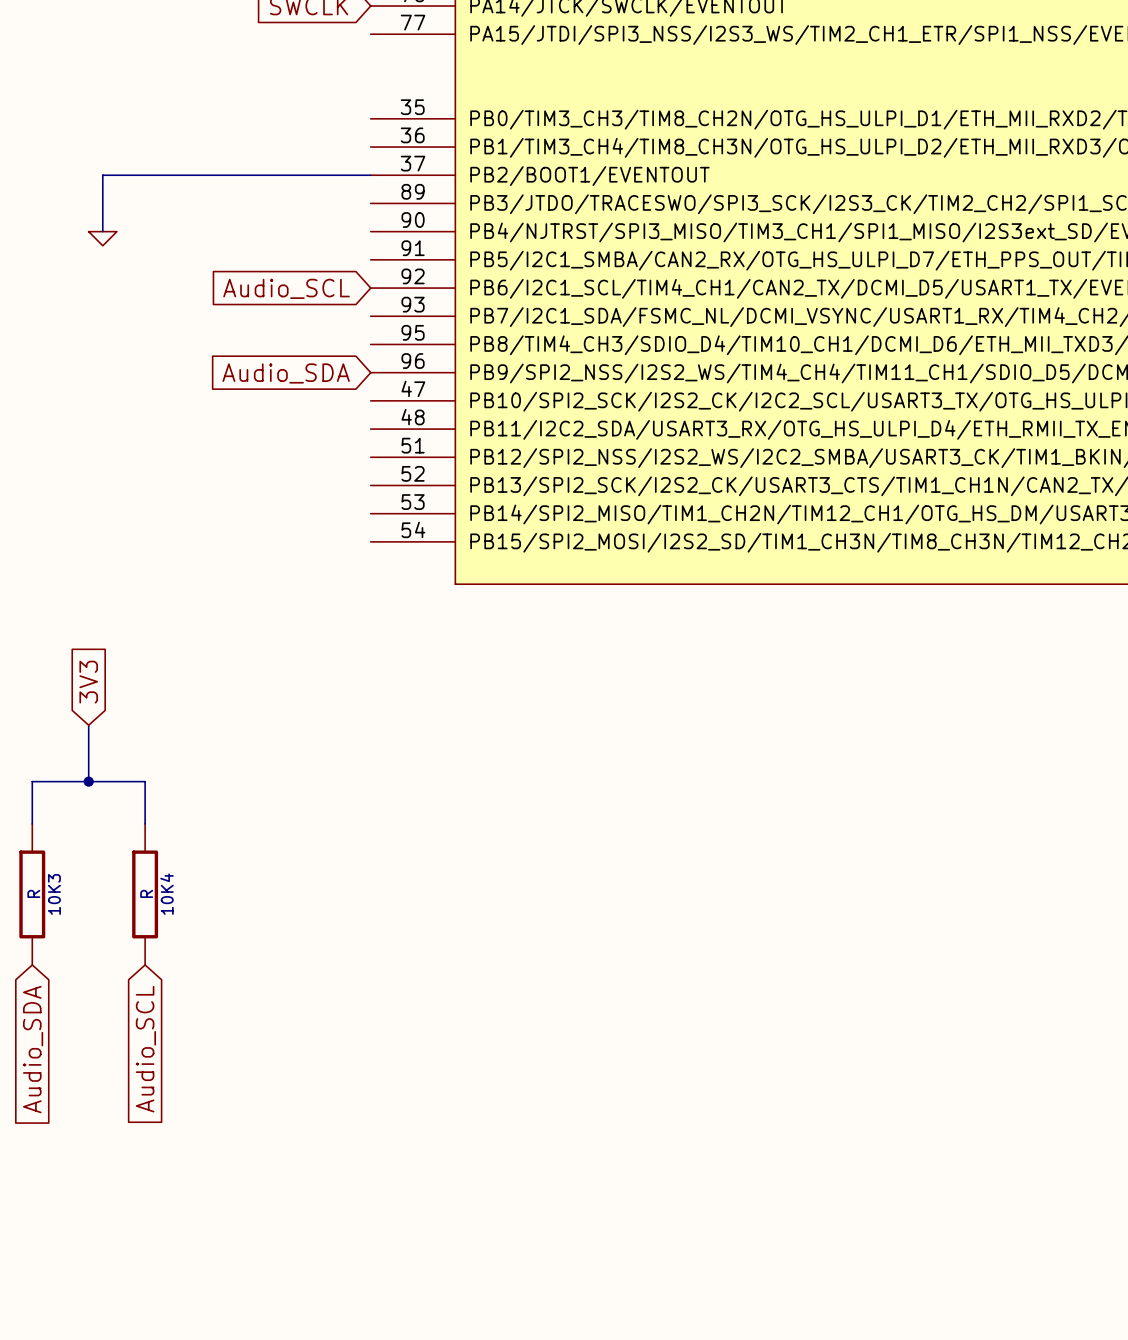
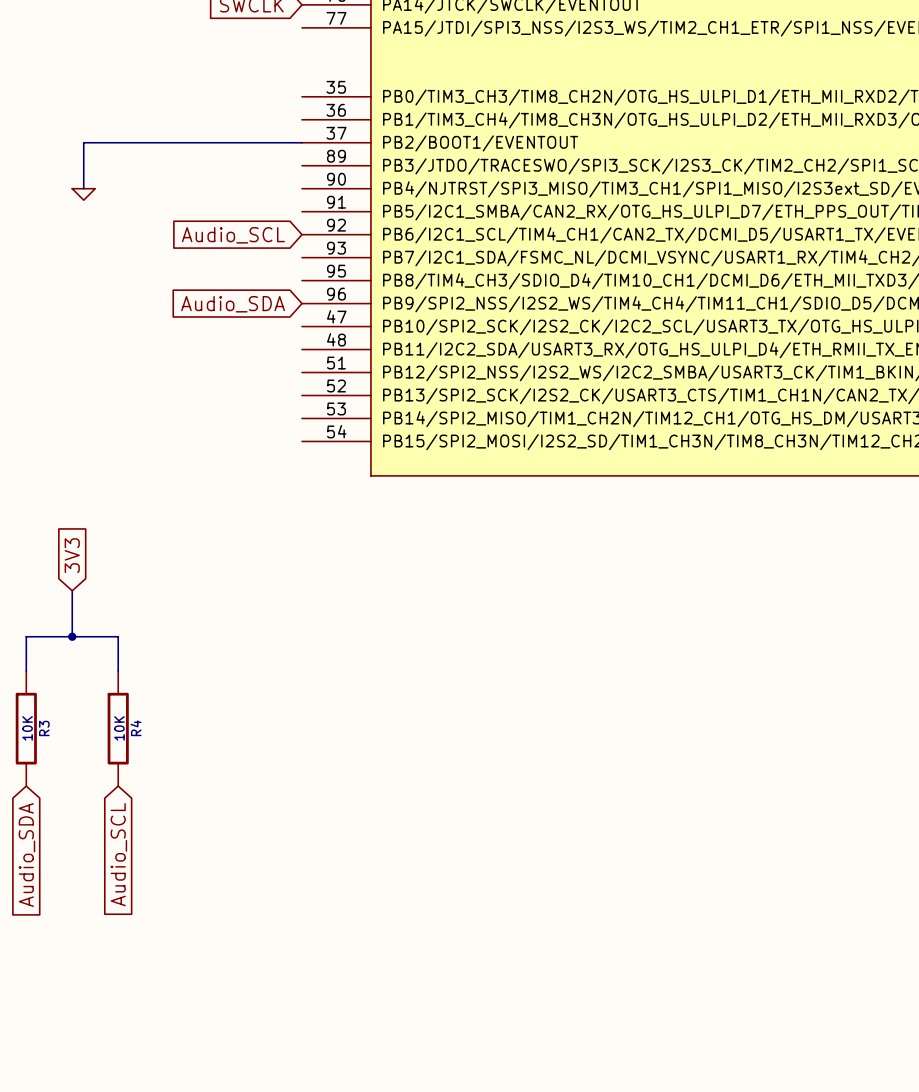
10K3 value: R (33, 893) -> 10K (27, 728)
10K4 value: R (146, 893) -> 10K (119, 728)
10K3 name: 10K3 (54, 894) -> R3 (44, 728)
10K4 name: 10K4 (166, 894) -> R4 (136, 728)

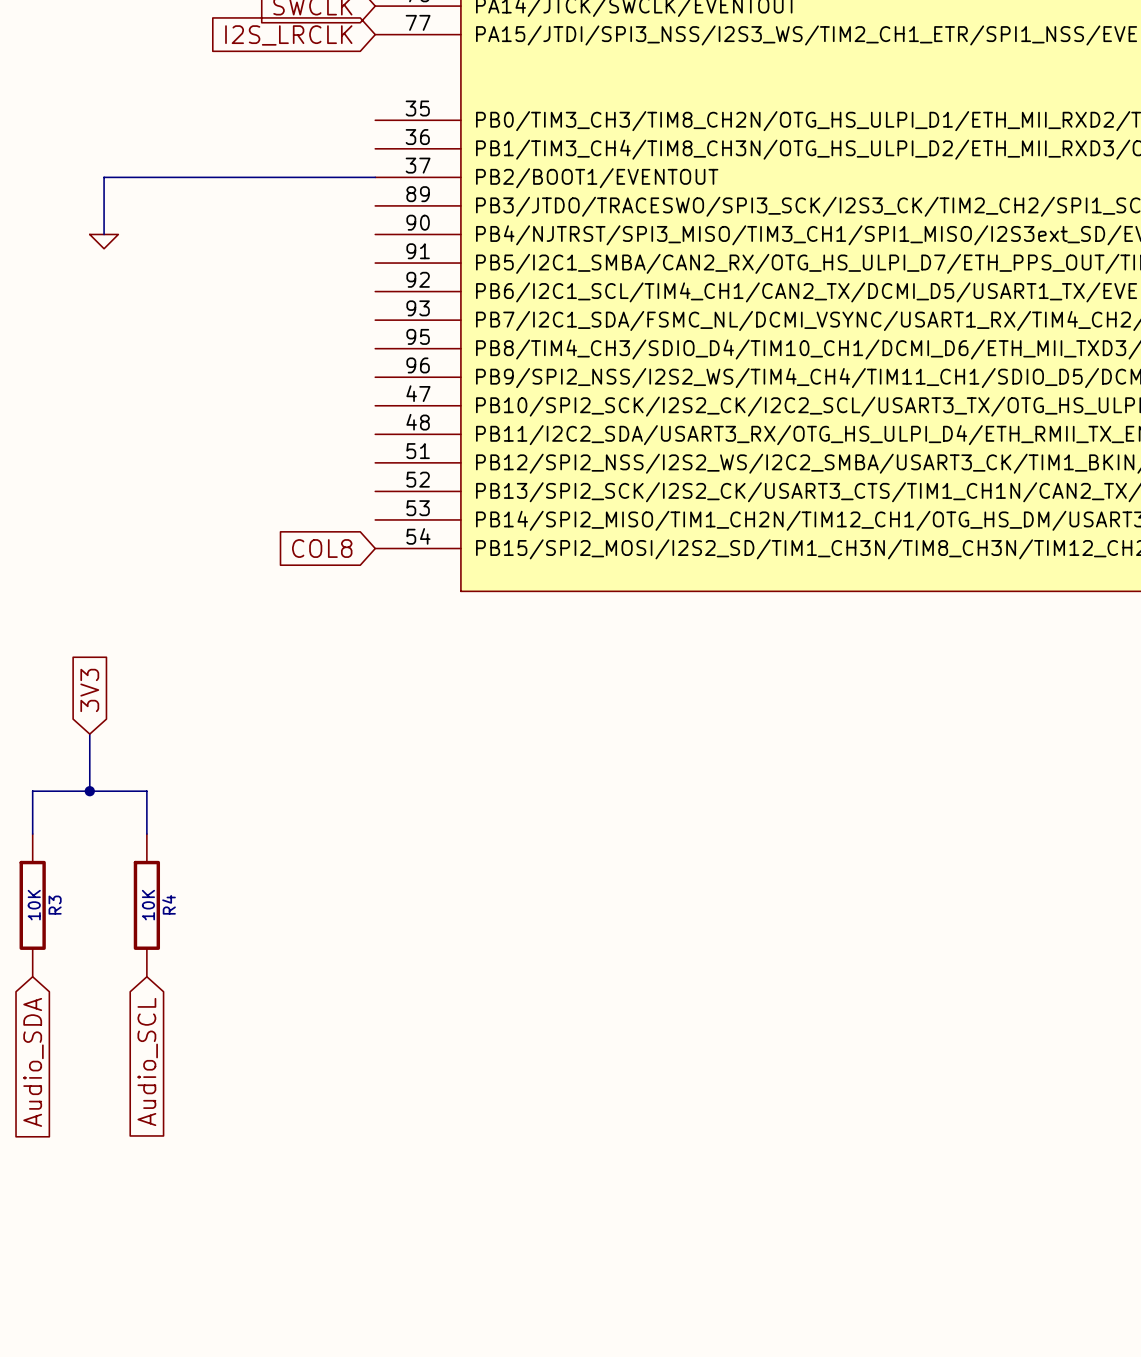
global label: none -> I2S_LRCLK (288, 35)
global label: Audio_SCL (233, 235) -> none
global label: Audio_SDA (233, 304) -> none
global label: none -> COL8 (322, 548)

